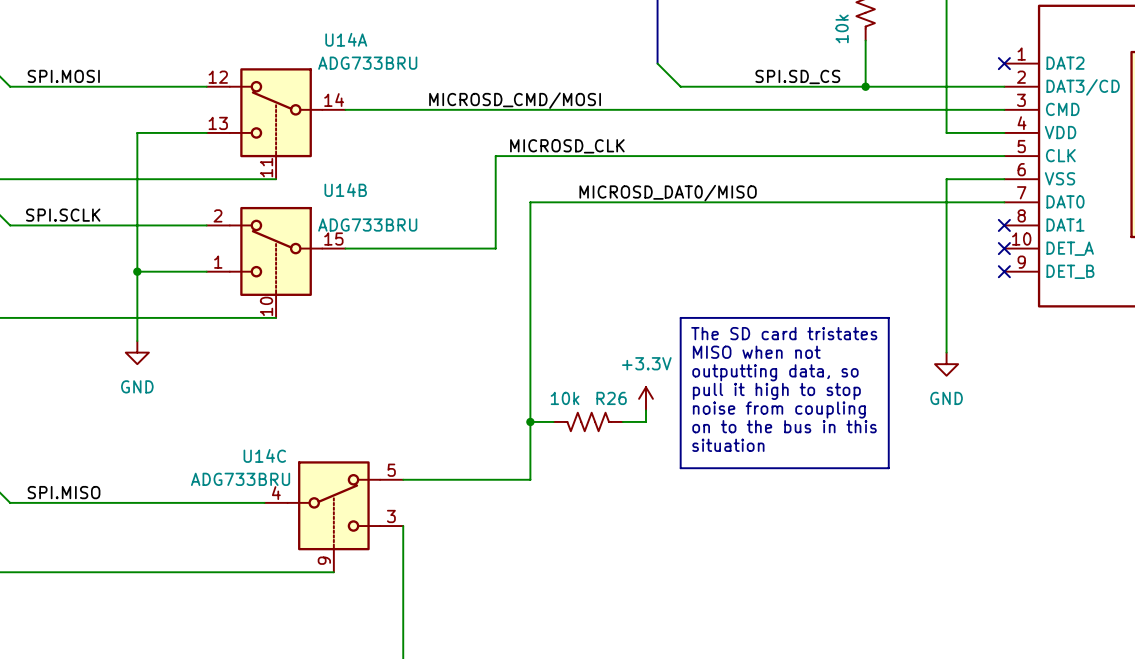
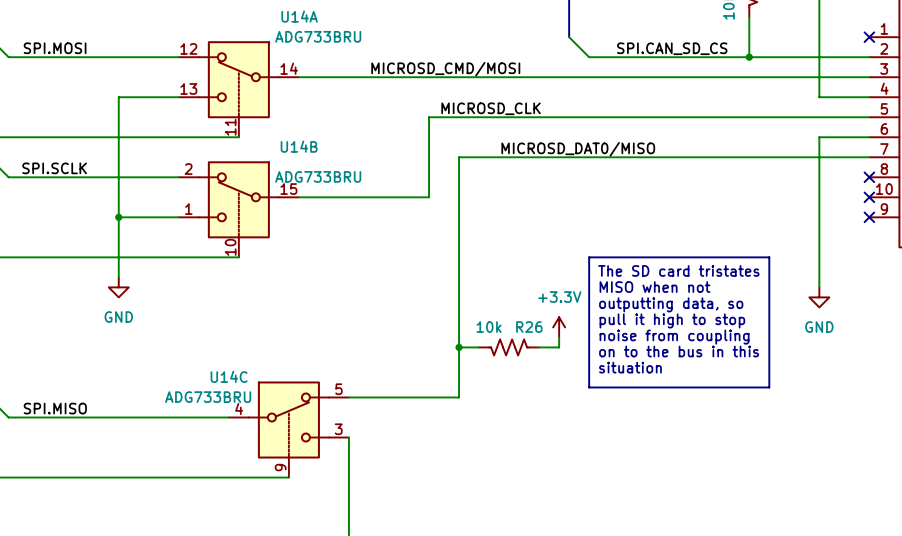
label: SPI.SD_CS (797, 76) -> SPI.CAN_SD_CS (672, 48)

